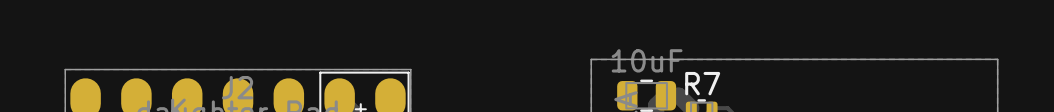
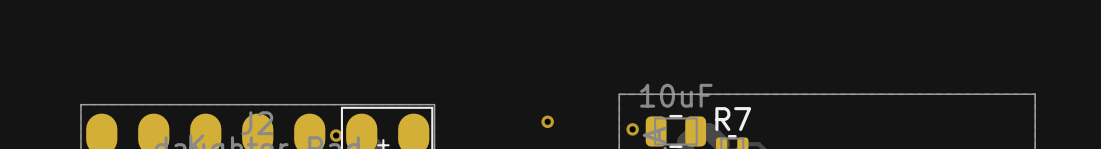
via: none -> (547, 121)
via: none -> (632, 129)
via: none -> (336, 135)

